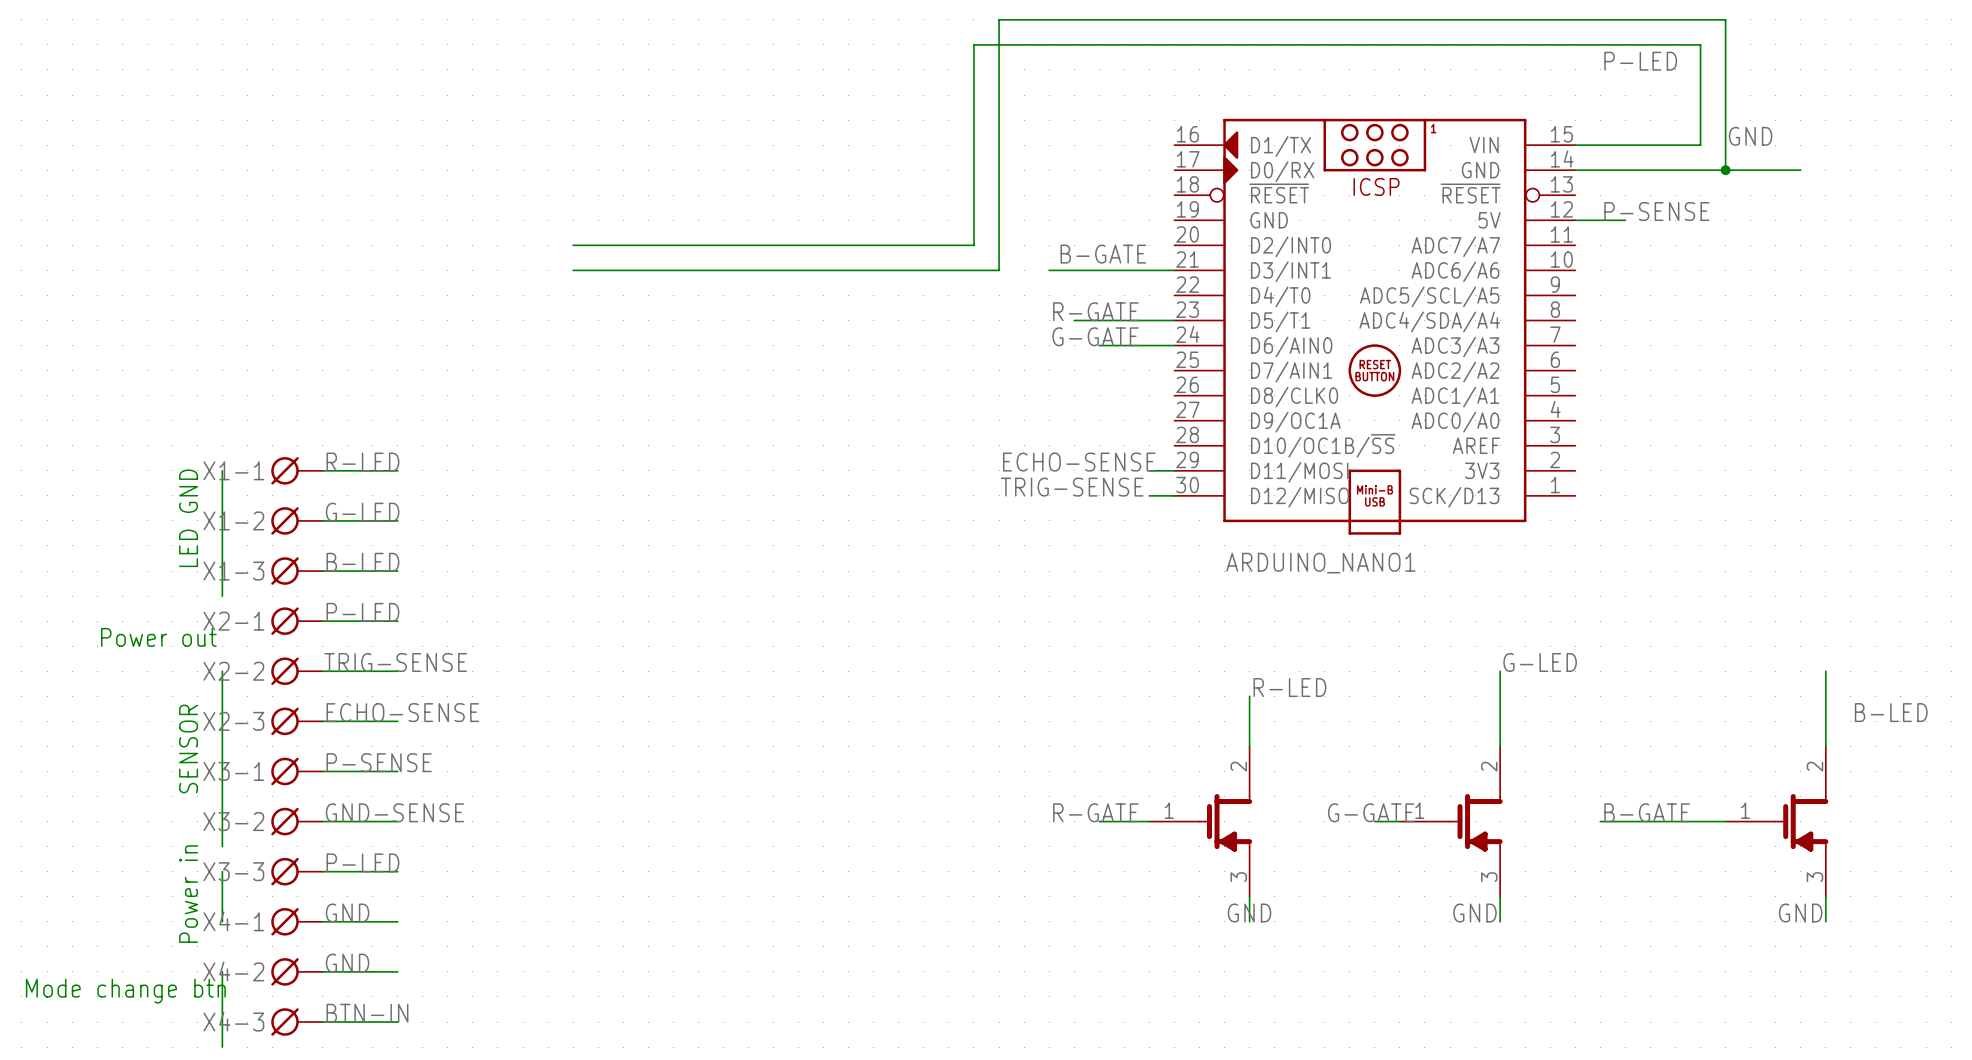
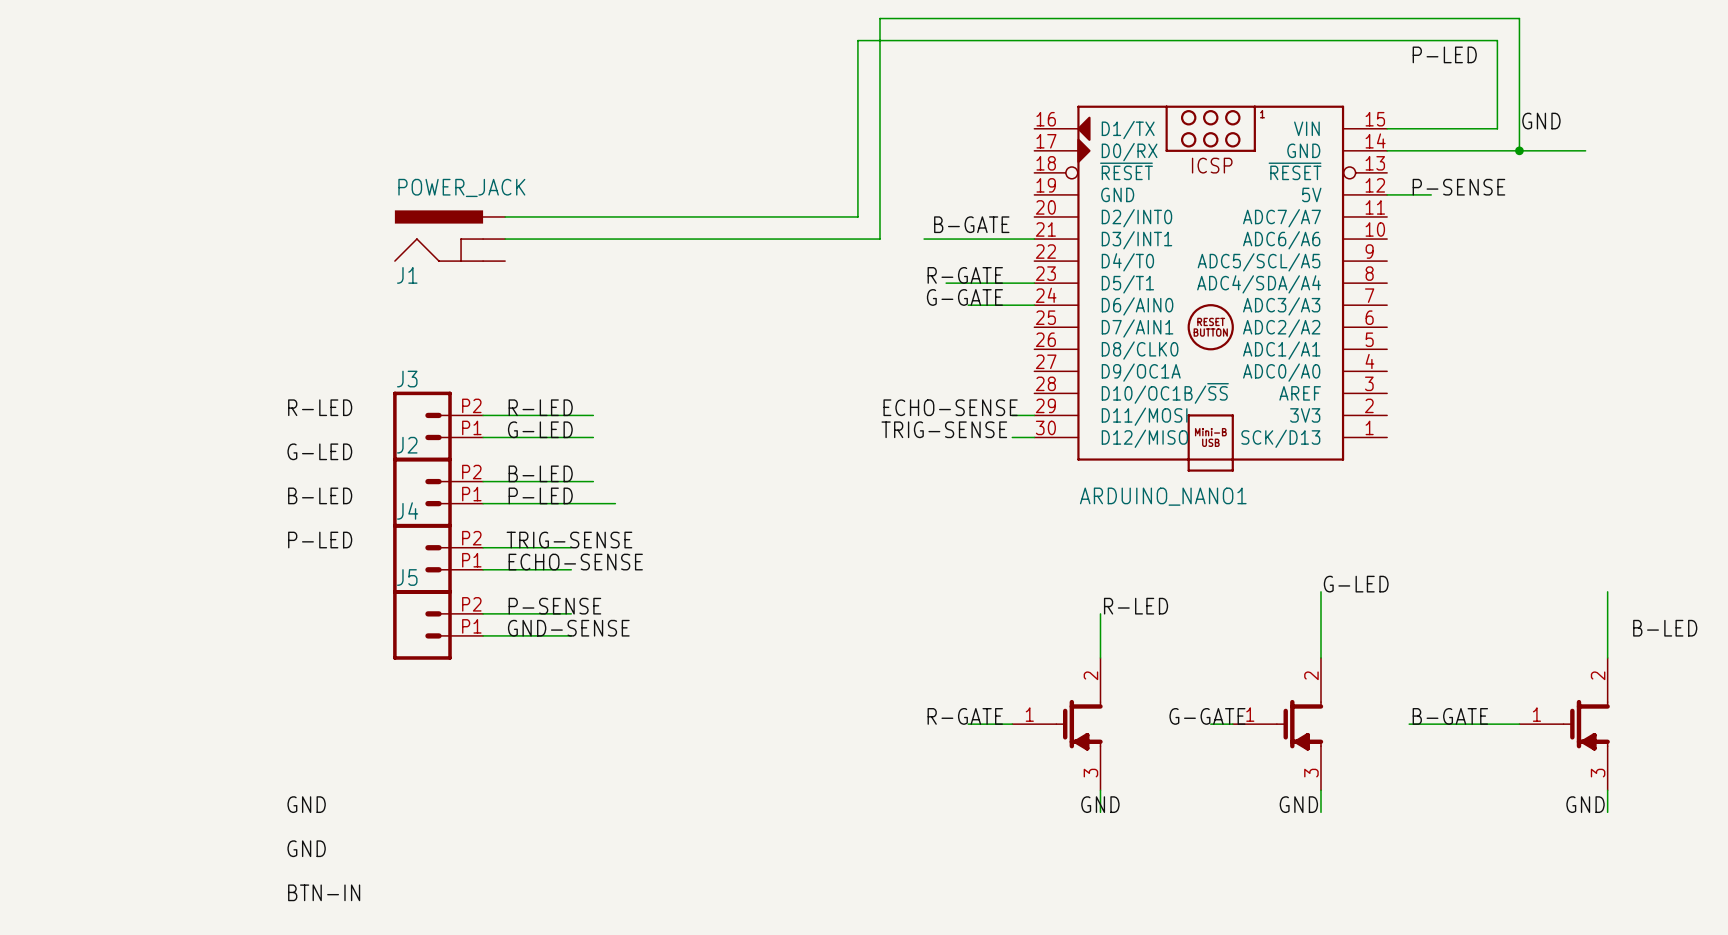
J1: none -> POWER_JACK (449, 236)
label: none -> R-LED (540, 407)
wire: (222, 470) (222, 596) -> none
X1-1: (296, 470) -> none
wire: (322, 470) (397, 470) -> none
wire: none -> (483, 415) (593, 415)
J3: none -> (438, 426)
label: none -> G-LED (540, 429)
wire: none -> (483, 437) (593, 437)
text: LED GND (188, 518) -> none
X1-2: (296, 520) -> none
wire: (322, 520) (397, 520) -> none
label: none -> B-LED (540, 473)
wire: none -> (483, 481) (593, 481)
J2: none -> (438, 492)
label: none -> P-LED (540, 495)
X1-3: (296, 571) -> none
wire: (322, 571) (397, 571) -> none
wire: none -> (483, 503) (615, 503)
label: none -> TRIG-SENSE (569, 540)
X2-1: (296, 621) -> none
wire: (322, 621) (397, 621) -> none
wire: none -> (483, 547) (571, 547)
J4: none -> (438, 558)
text: Power out (158, 637) -> none
label: none -> ECHO-SENSE (575, 562)
wire: none -> (483, 569) (571, 569)
label: TRIG-SENSE (395, 662) -> none
wire: (222, 671) (222, 846) -> none
X2-2: (296, 671) -> none
wire: (322, 671) (397, 671) -> none
label: none -> P-SENSE (554, 606)
wire: none -> (483, 613) (571, 613)
J5: none -> (438, 624)
label: ECHO-SENSE (402, 712) -> none
label: none -> GND-SENSE (568, 628)
X2-3: (296, 721) -> none
wire: (322, 721) (397, 721) -> none
wire: none -> (483, 635) (571, 635)
text: SENSOR (188, 749) -> none
label: P-SENSE (379, 762) -> none
X3-1: (296, 771) -> none
wire: (322, 771) (397, 771) -> none
label: GND-SENSE (394, 812) -> none
X3-2: (296, 821) -> none
wire: (322, 821) (397, 821) -> none
label: P-LED (362, 862) -> none
wire: (222, 871) (222, 921) -> none
X3-3: (296, 871) -> none
wire: (322, 871) (397, 871) -> none
text: Power in (188, 894) -> none
X4-1: (296, 921) -> none
wire: (322, 921) (397, 921) -> none
wire: (222, 971) (222, 1047) -> none
X4-2: (296, 971) -> none
wire: (322, 971) (397, 971) -> none
text: Mode change btn (125, 991) -> none
X4-3: (296, 1022) -> none
wire: (322, 1022) (397, 1022) -> none

